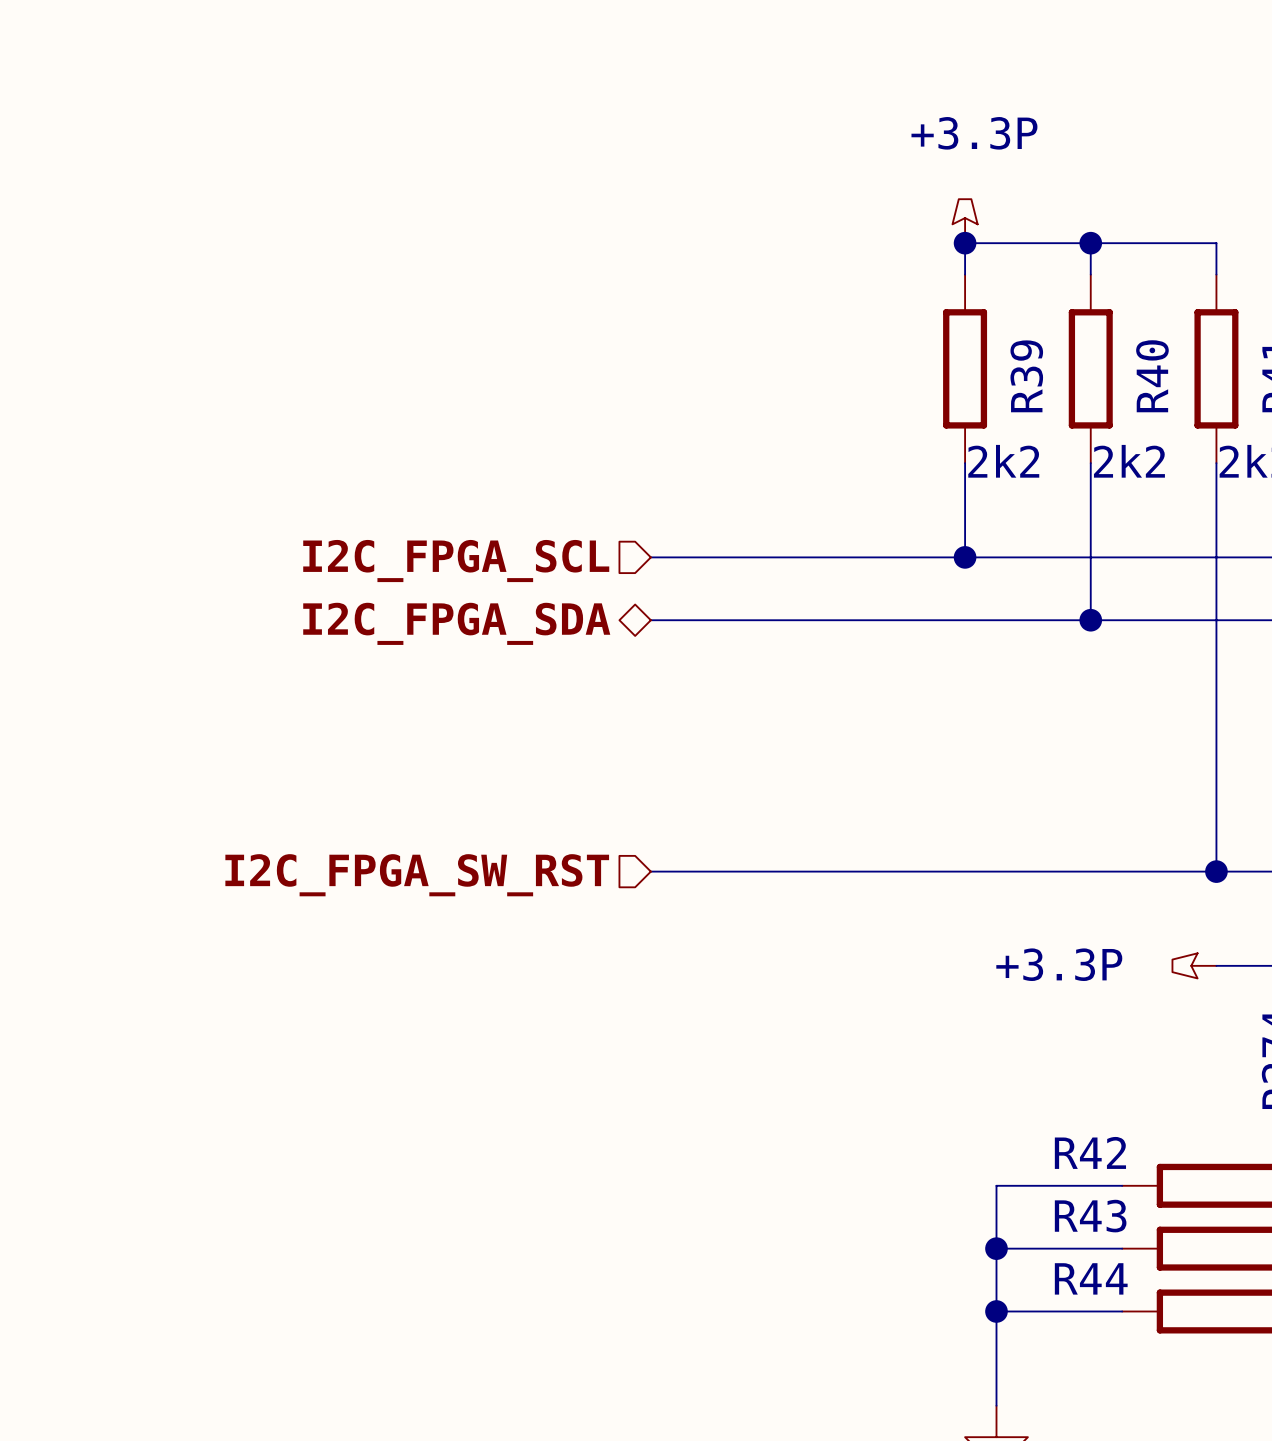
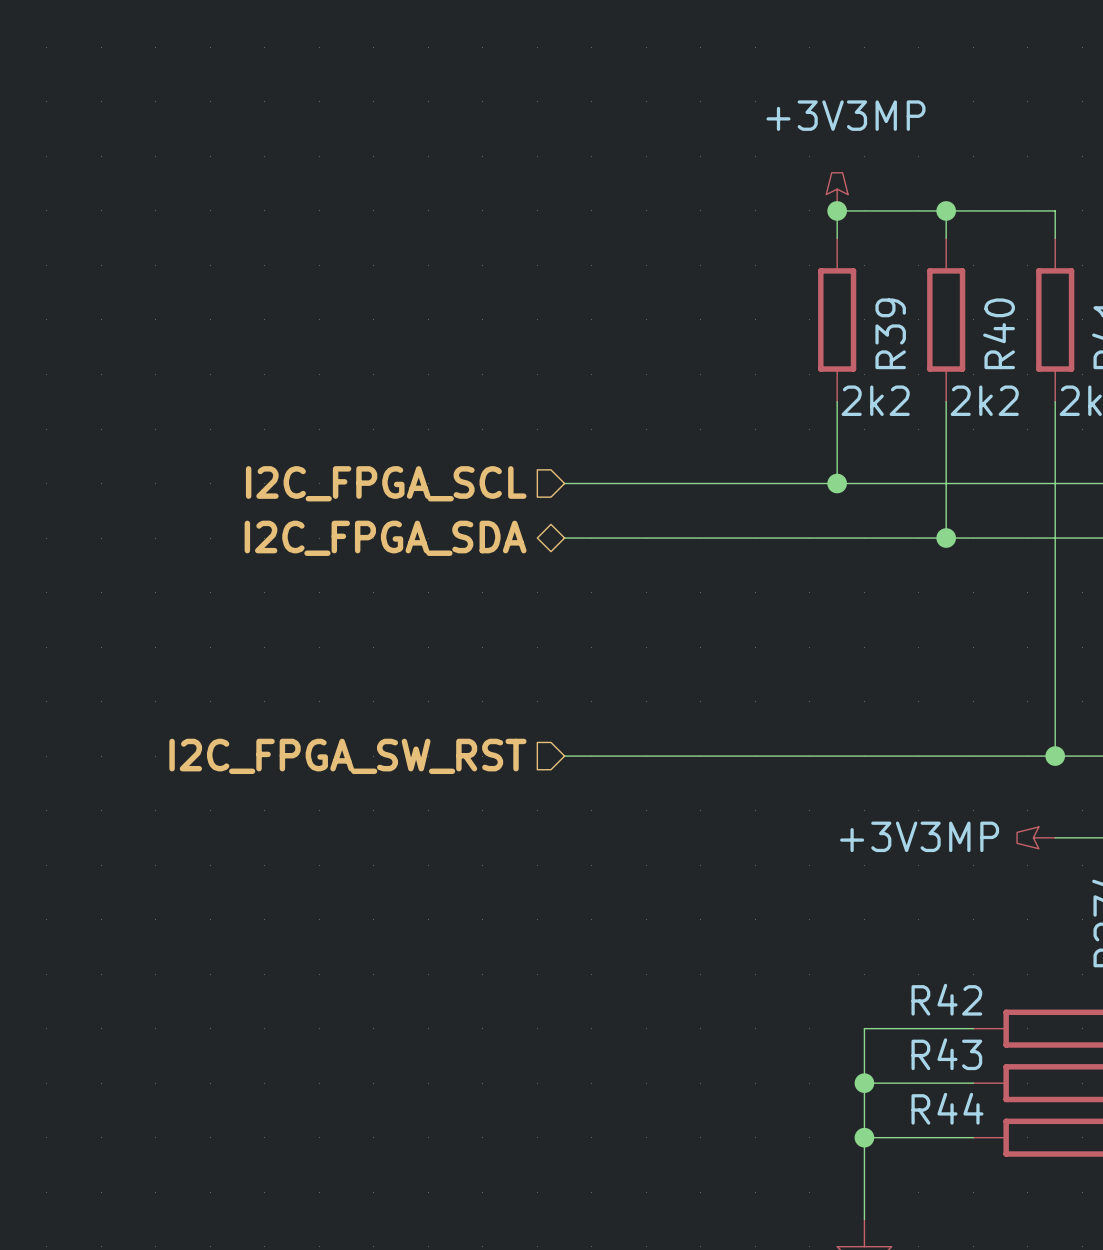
power symbol: +3.3P (965, 221) -> +3V3MP (837, 191)
power symbol: +3.3P (1194, 965) -> +3V3MP (1036, 837)

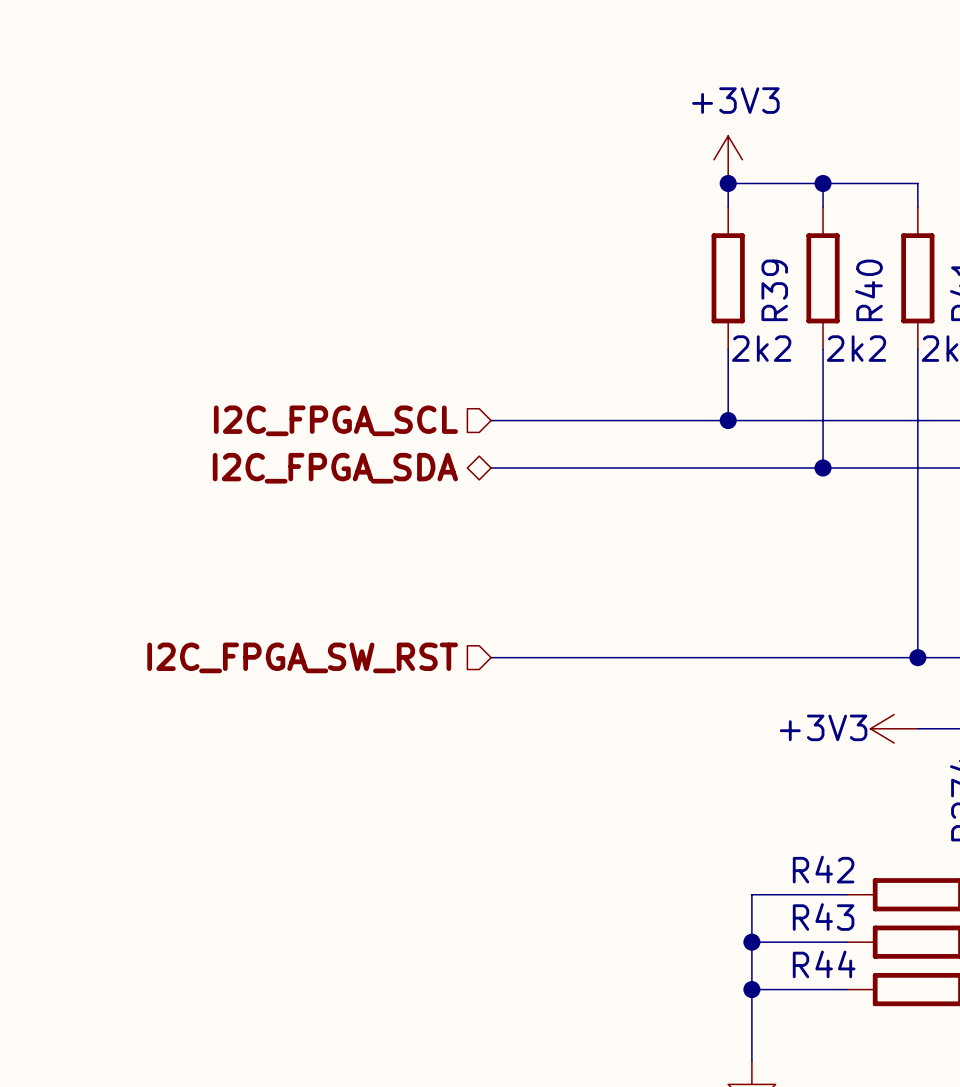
power symbol: +3V3MP (837, 191) -> +3V3 (728, 159)
power symbol: +3V3MP (1036, 837) -> +3V3 (894, 728)

